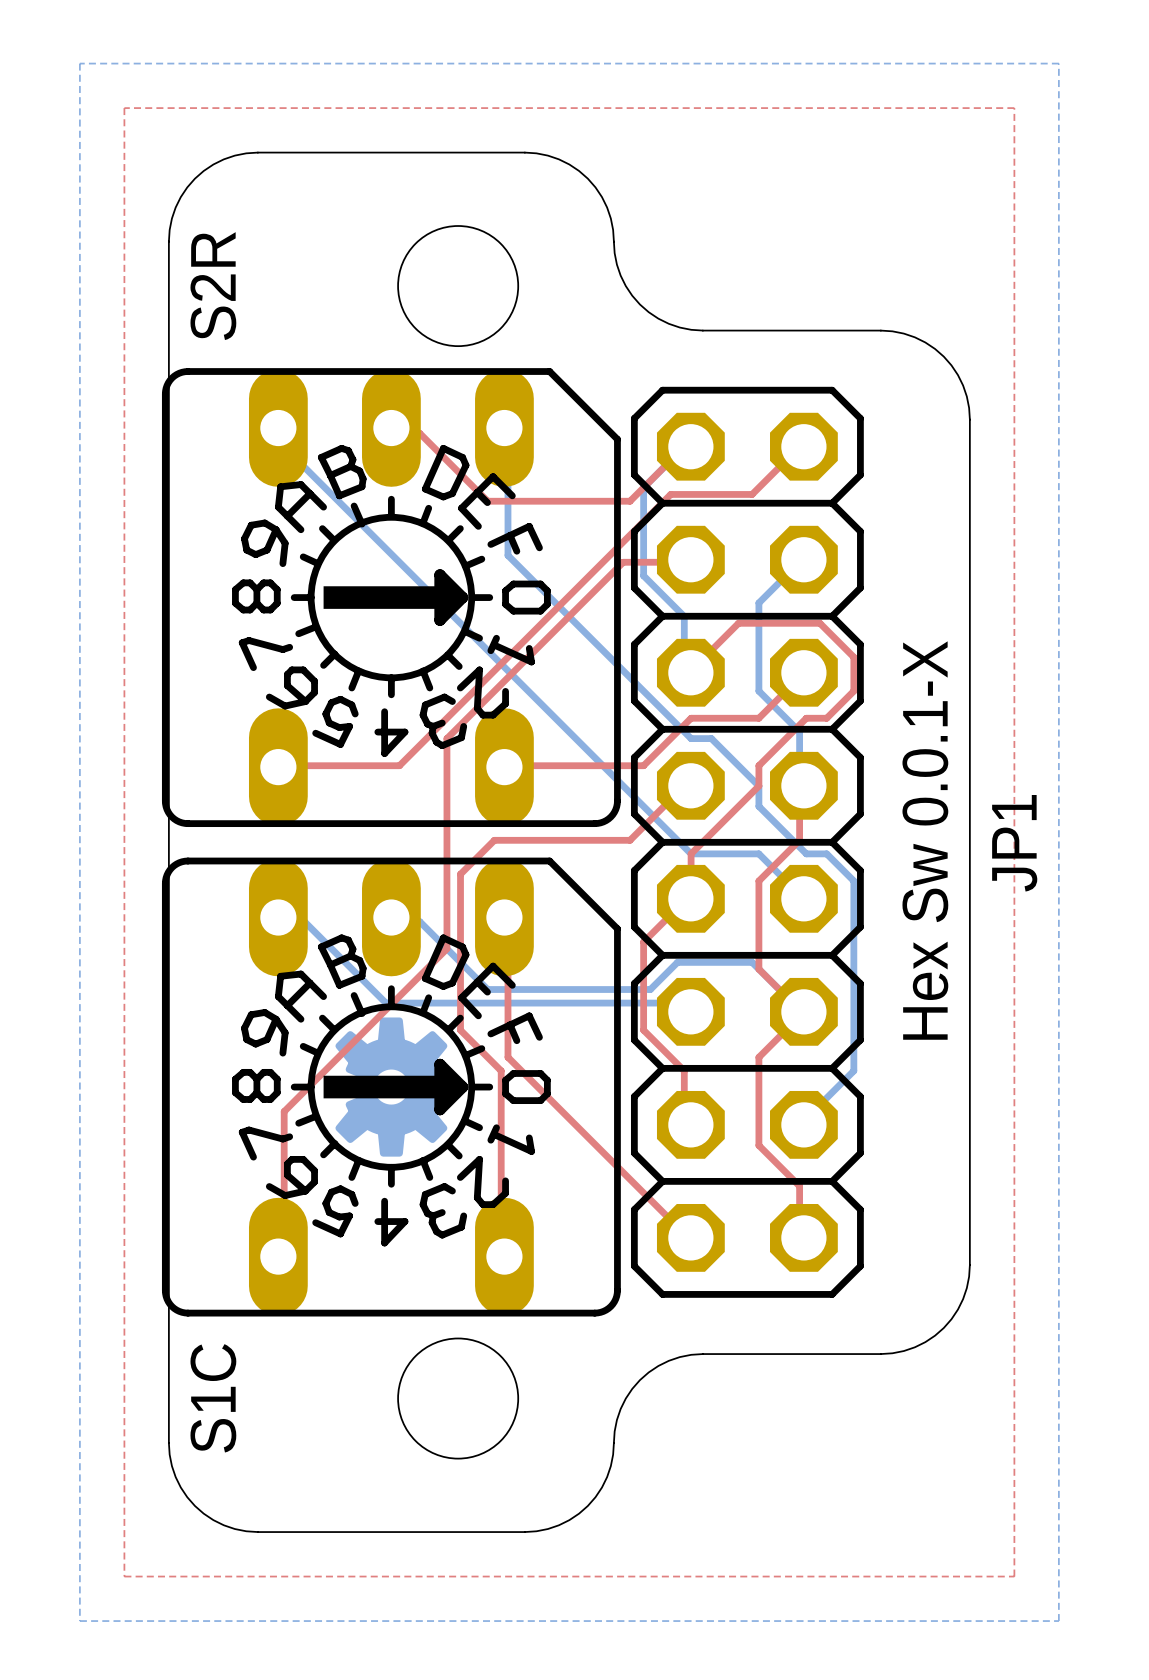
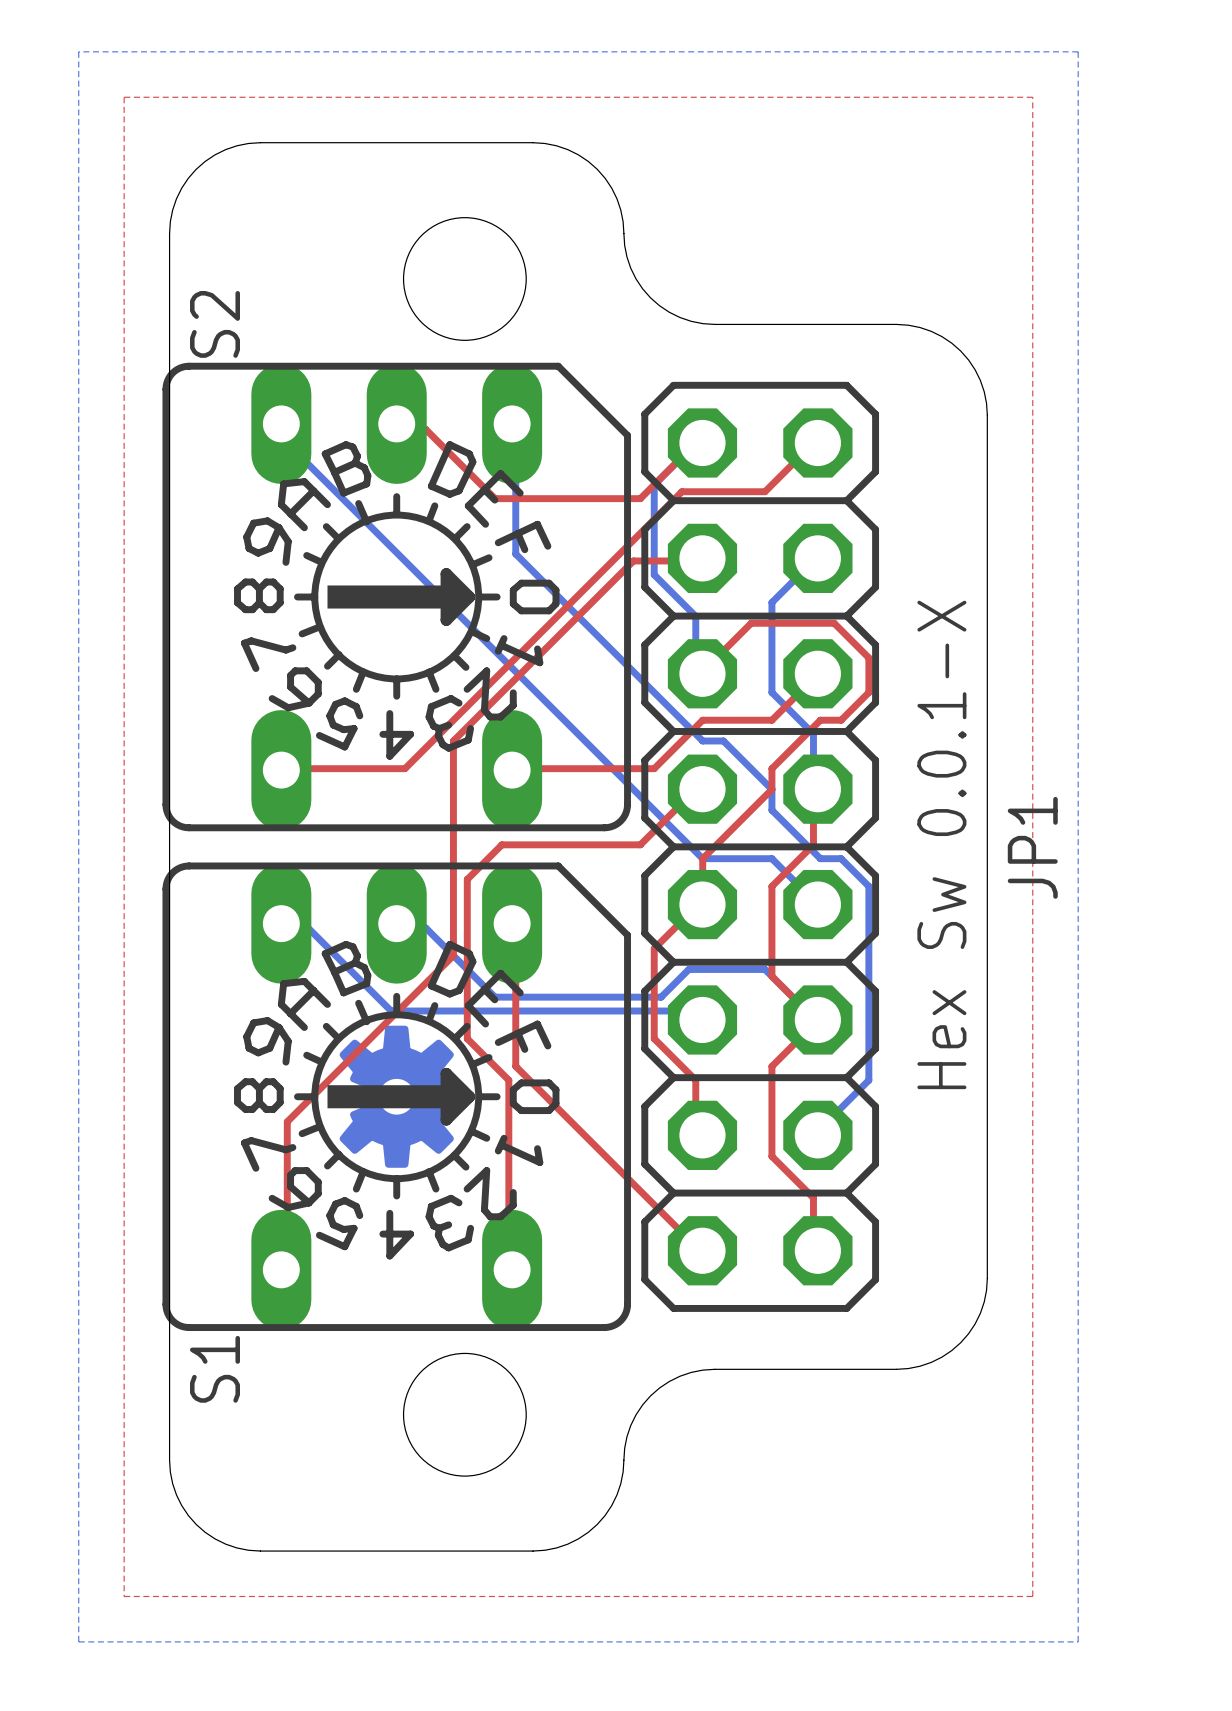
S2R name: S2R (213, 286) -> S2 (215, 324)
S1C name: S1C (213, 1398) -> S1 (215, 1369)

